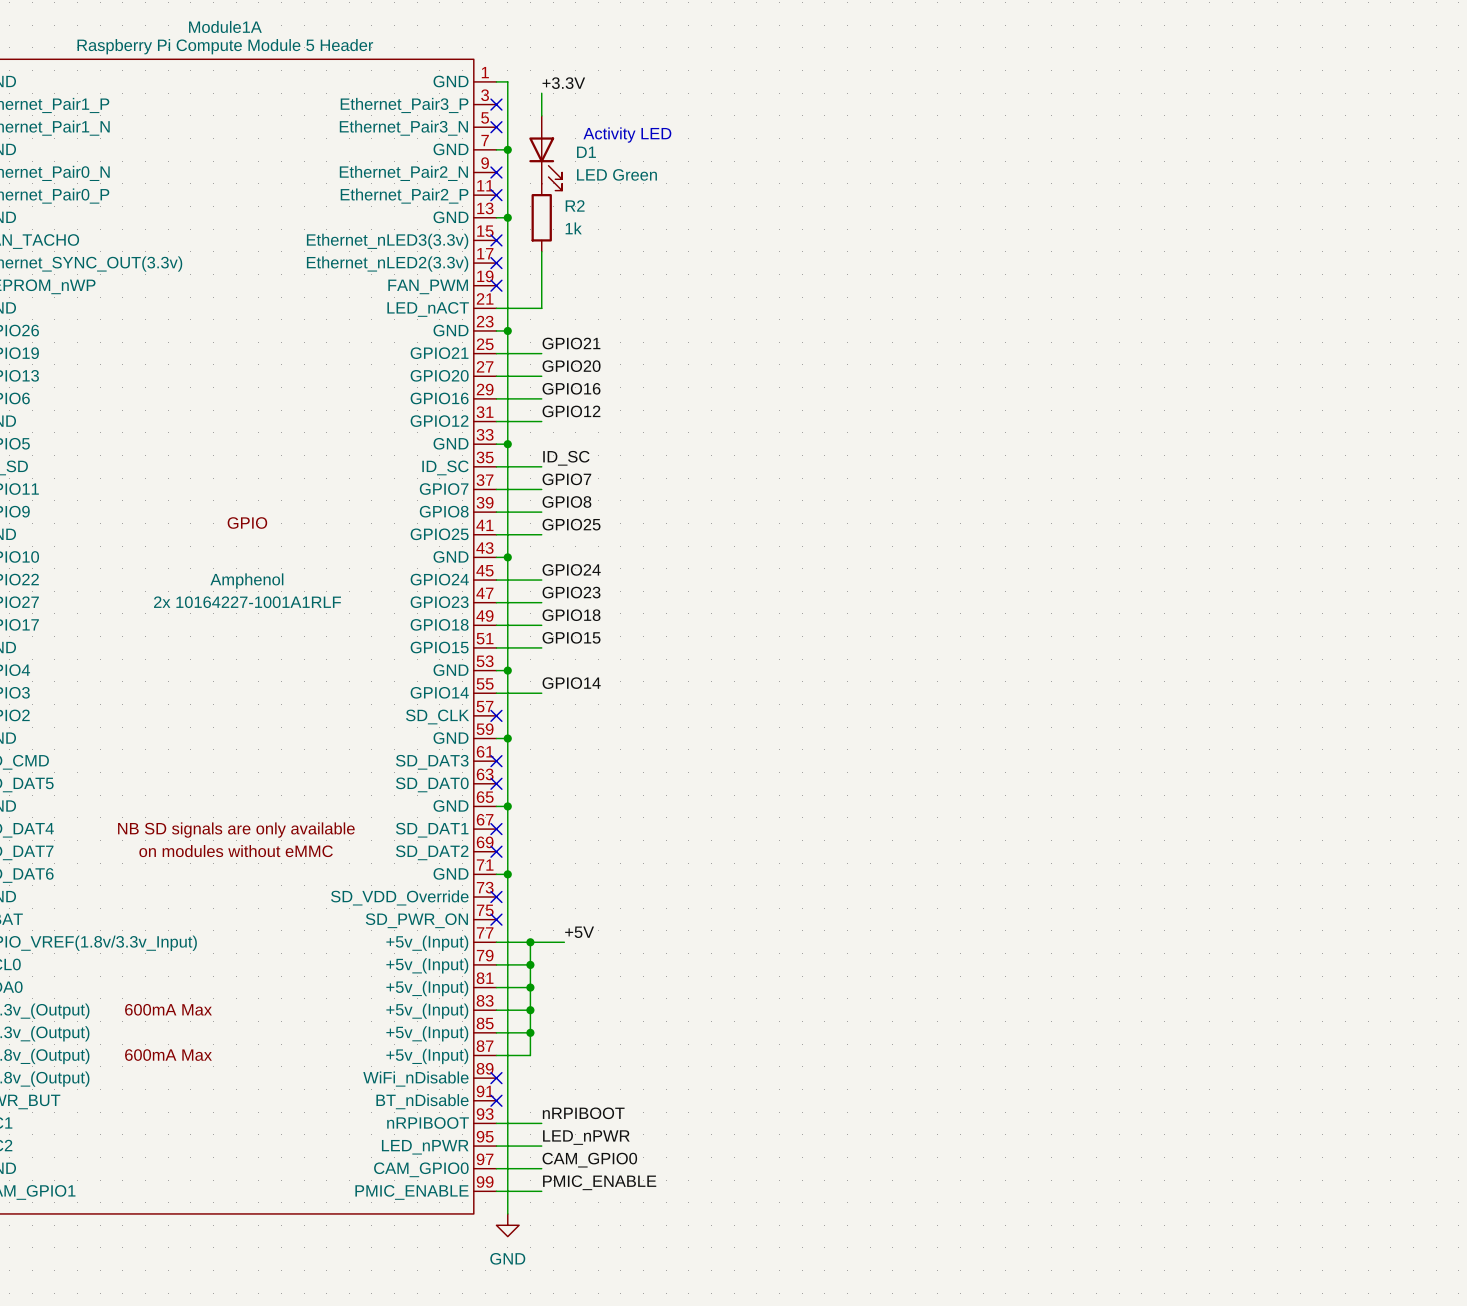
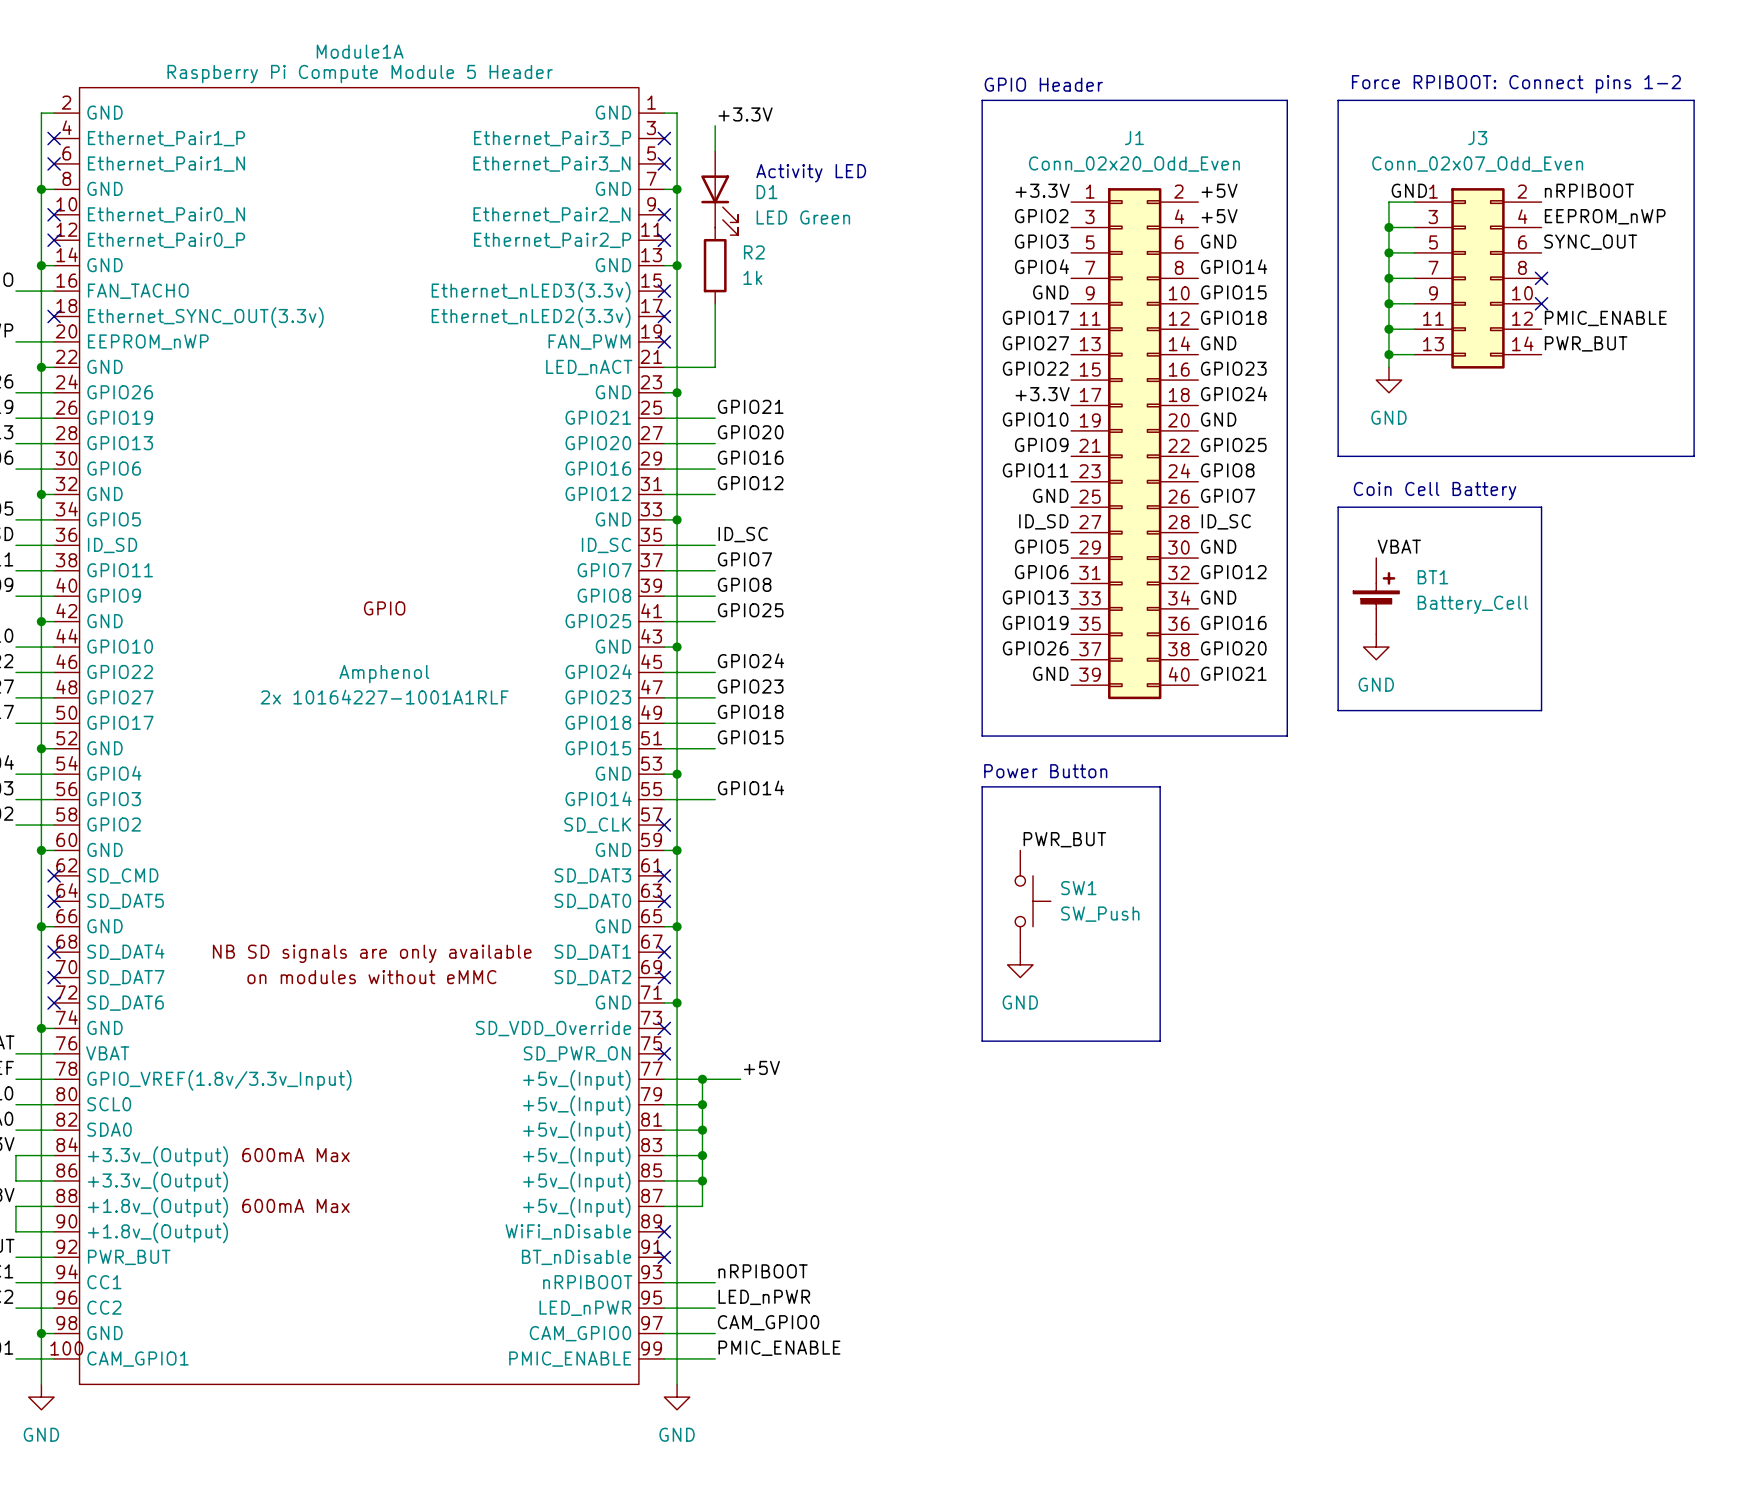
text: none -> Force RPIBOOT: Connect pins 1-2 (1516, 84)
text: none -> GPIO Header (1043, 84)
line: none -> (982, 100) (1287, 100) (1287, 736) (982, 736) (982, 100)
line: none -> (1338, 100) (1694, 100) (1694, 456) (1338, 456) (1338, 100)
label: none -> +3.3V (1042, 190)
label: none -> +5V (1219, 190)
label: none -> GND (1409, 190)
label: none -> nRPIBOOT (1589, 190)
wire: none -> (1414, 202) (1388, 202) (1388, 367)
label: none -> GPIO2 (1041, 216)
label: none -> +5V (1219, 216)
label: none -> EEPROM_nWP (1605, 216)
wire: none -> (1388, 227) (1414, 227)
junction: none -> (1388, 227)
label: none -> GPIO3 (1041, 241)
label: none -> GND (1218, 241)
label: none -> SYNC_OUT (1590, 242)
wire: none -> (1388, 252) (1414, 252)
junction: none -> (1388, 252)
label: none -> GPIO4 (1042, 266)
label: none -> GPIO14 (1234, 266)
wire: none -> (1388, 278) (1414, 278)
junction: none -> (1388, 278)
J3: none -> Conn_02x07_Odd_Even (1477, 278)
no-connect mark: none -> (1541, 278)
label: none -> GND (1050, 292)
label: none -> GPIO15 (1233, 292)
wire: none -> (1388, 303) (1414, 303)
junction: none -> (1388, 303)
no-connect mark: none -> (1541, 303)
label: none -> GPIO17 (1035, 317)
label: none -> GPIO18 (1233, 317)
label: none -> PMIC_ENABLE (1605, 318)
wire: none -> (1388, 329) (1414, 329)
junction: none -> (1388, 329)
label: none -> GPIO27 (1035, 343)
label: none -> GND (1218, 343)
label: none -> PWR_BUT (1586, 343)
wire: none -> (1388, 354) (1414, 354)
junction: none -> (1388, 354)
label: none -> GPIO22 (1035, 368)
label: none -> GPIO23 (1233, 368)
power symbol: none -> GND (1388, 380)
label: none -> +3.3V (1042, 394)
label: none -> GPIO24 (1234, 393)
label: none -> GPIO10 (1035, 419)
label: none -> GND (1218, 419)
J1: none -> Conn_02x20_Odd_Even (1134, 443)
label: none -> GPIO9 (1041, 444)
label: none -> GPIO25 (1233, 444)
label: none -> GPIO11 (1035, 470)
label: none -> GPIO8 (1227, 470)
text: none -> Coin Cell Battery (1435, 491)
label: none -> GND (1050, 495)
label: none -> GPIO7 (1228, 495)
line: none -> (1338, 507) (1338, 710) (1541, 710) (1541, 507) (1338, 507)
label: none -> ID_SD (1043, 521)
label: none -> ID_SC (1226, 521)
label: none -> GPIO5 (1041, 546)
label: none -> GND (1218, 546)
label: none -> VBAT (1399, 546)
label: none -> GPIO6 (1041, 572)
label: none -> GPIO12 (1233, 572)
BT1: none -> Battery_Cell (1376, 596)
label: none -> GPIO13 (1035, 597)
label: none -> GND (1218, 597)
label: none -> GPIO19 (1035, 622)
label: none -> GPIO16 (1233, 622)
power symbol: none -> GND (1376, 647)
label: none -> GPIO26 (1035, 648)
label: none -> GPIO20 (1233, 648)
label: none -> GND (1050, 673)
label: none -> GPIO21 (1233, 673)
text: none -> Power Button (1045, 771)
line: none -> (982, 786) (982, 1041) (1160, 1041) (1160, 786) (982, 786)
label: none -> PWR_BUT (1064, 839)
SW1: none -> SW_Push (1033, 901)
power symbol: none -> GND (1020, 964)

